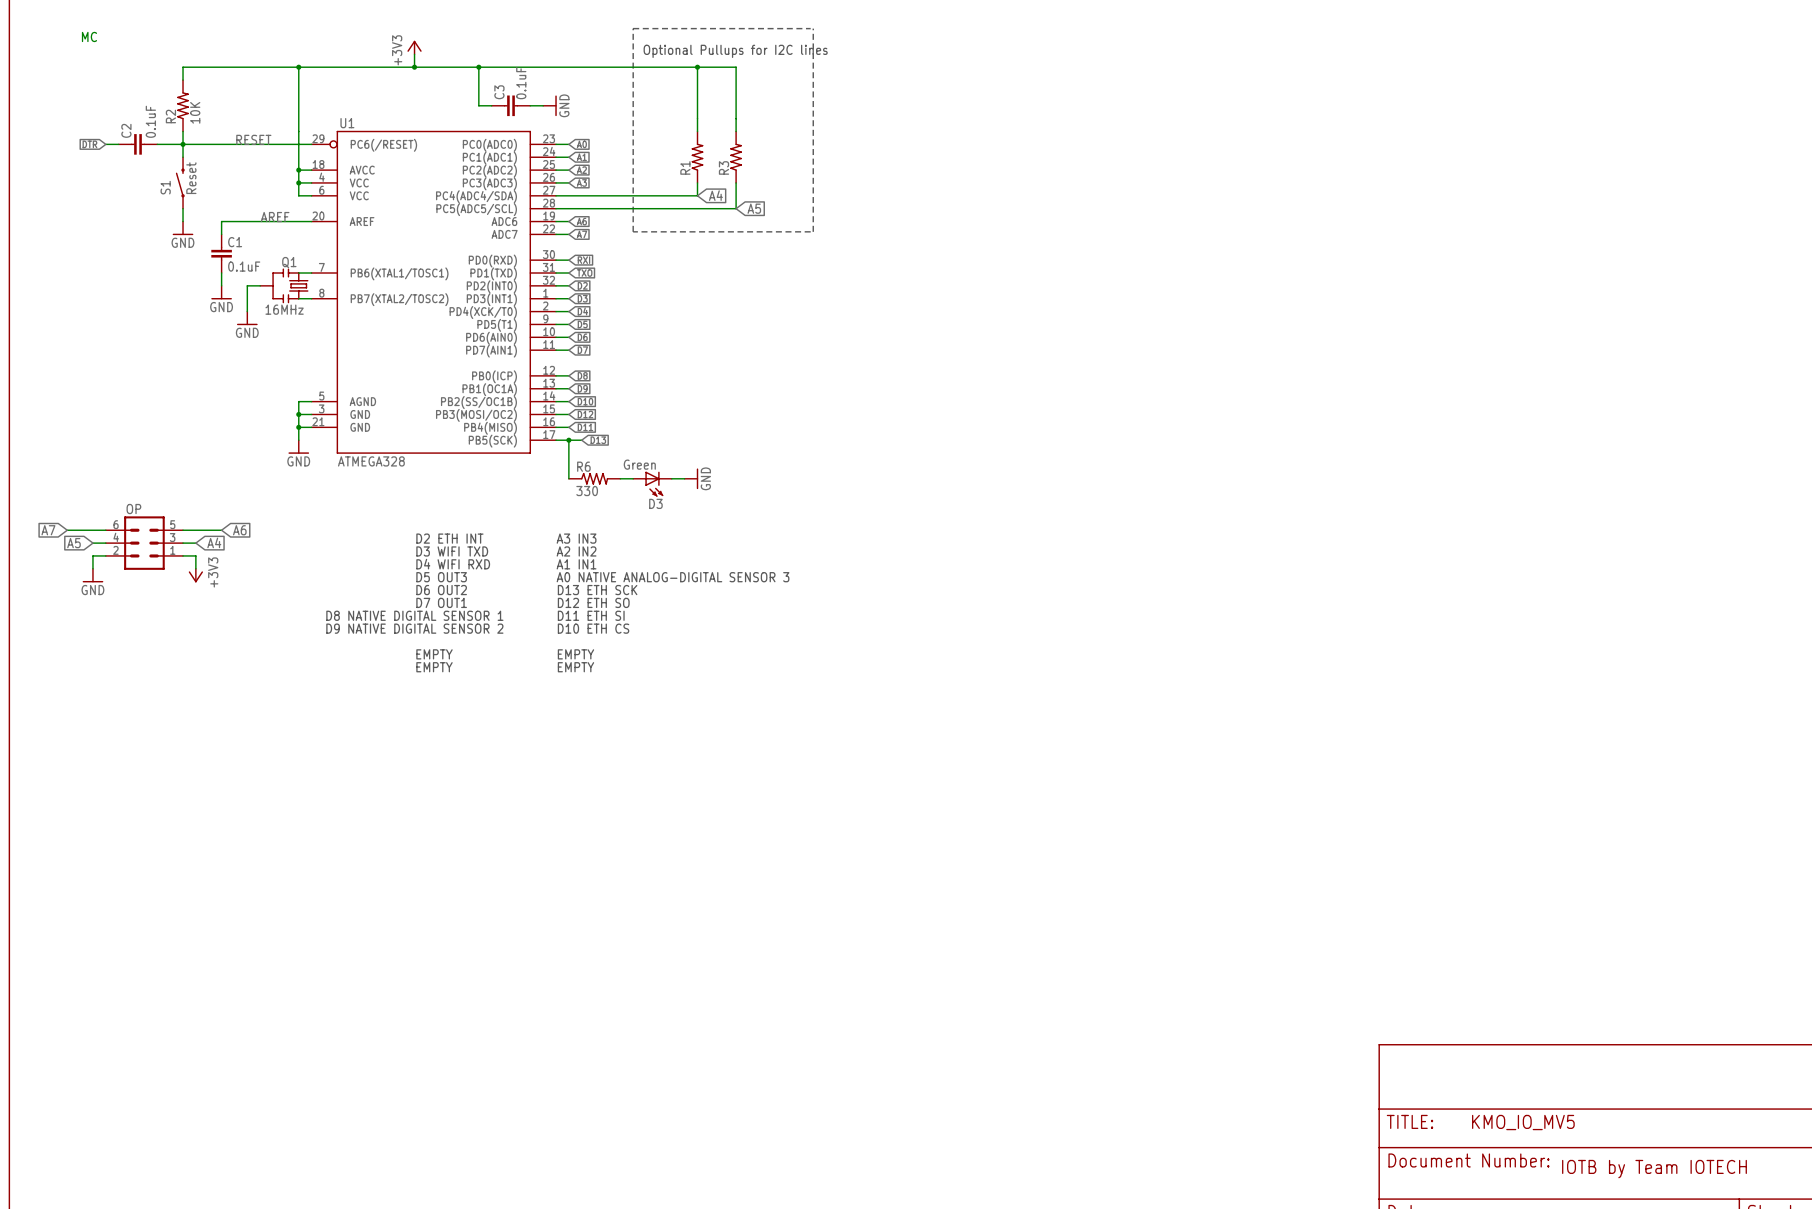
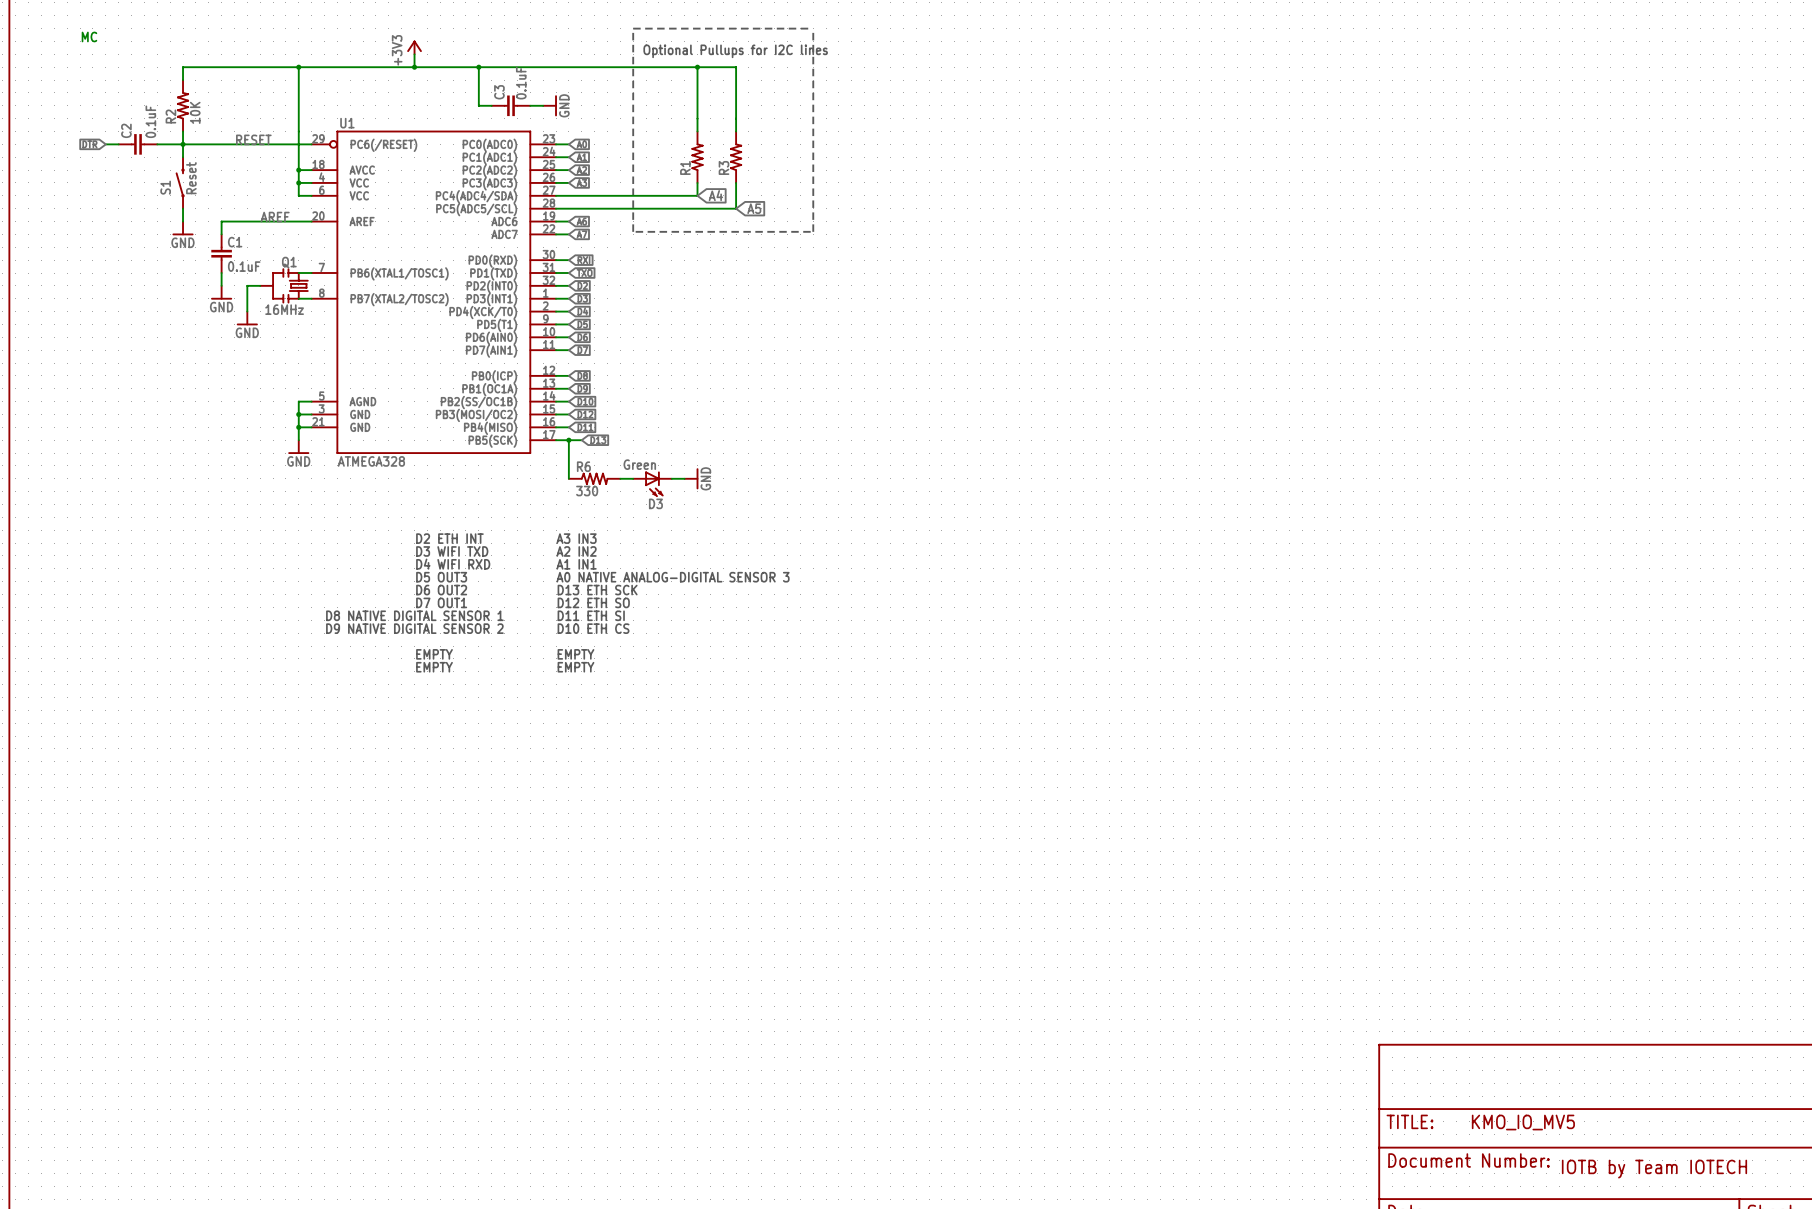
global label: A7 (48, 530) -> none
wire: (67, 530) (105, 530) -> none
wire: (183, 530) (221, 530) -> none
global label: A6 (239, 530) -> none
global label: A4 (214, 542) -> none
global label: A5 (73, 543) -> none
wire: (92, 543) (105, 543) -> none
OP: (144, 543) -> none
wire: (183, 543) (195, 543) -> none
wire: (105, 555) (92, 555) (92, 568) -> none
wire: (183, 555) (195, 555) (195, 568) -> none
power symbol: GND (92, 575) -> none
power symbol: +3V3 (195, 575) -> none

